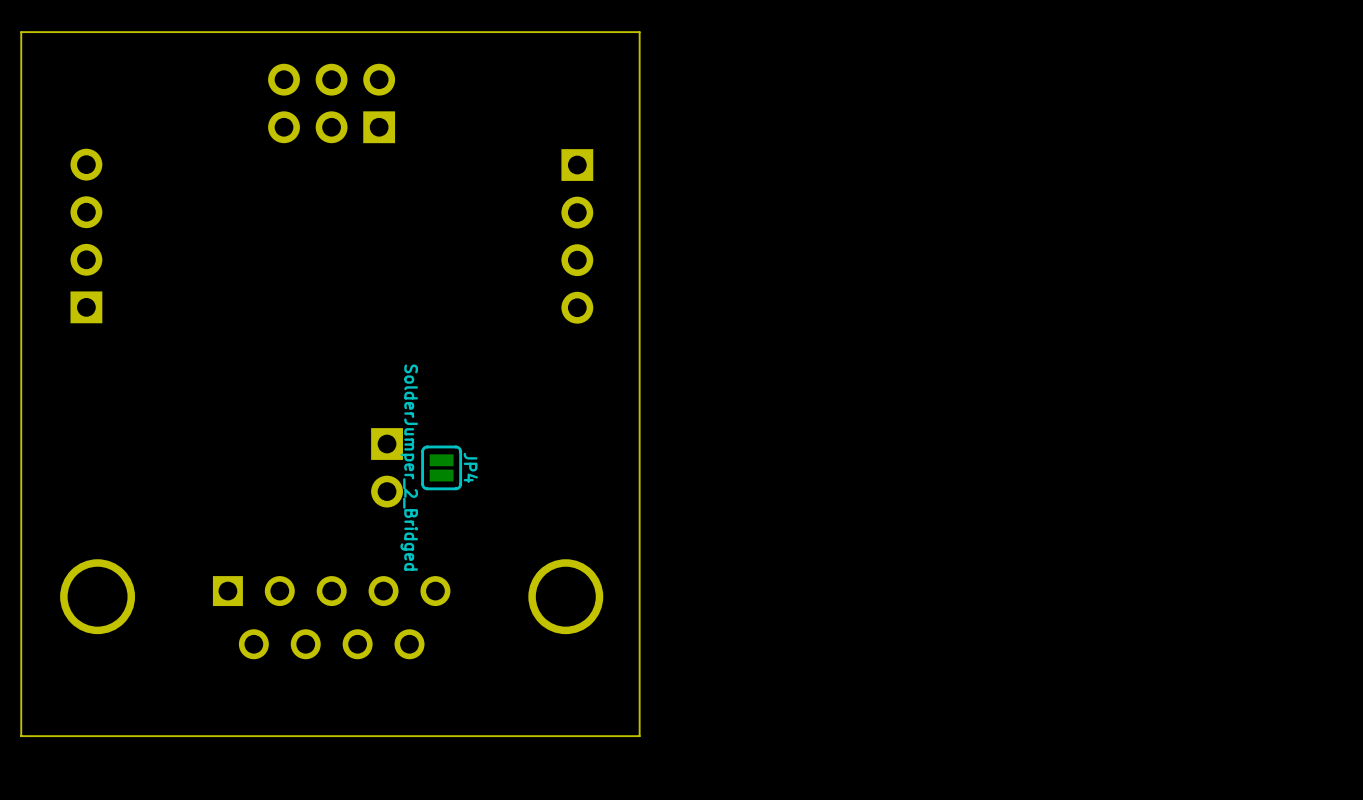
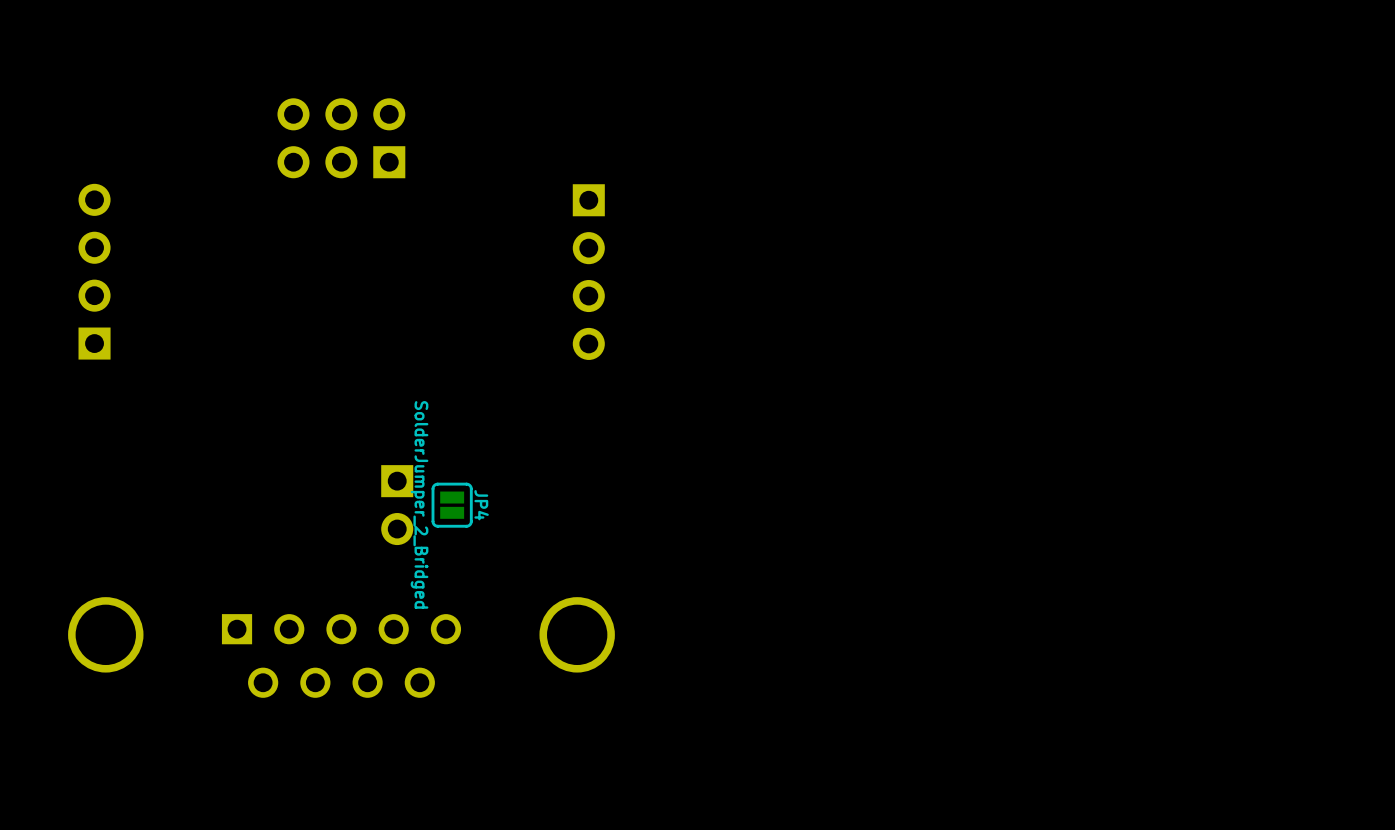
board edge: (639, 32) (639, 736) (21, 736) (21, 32) (639, 32) -> none

